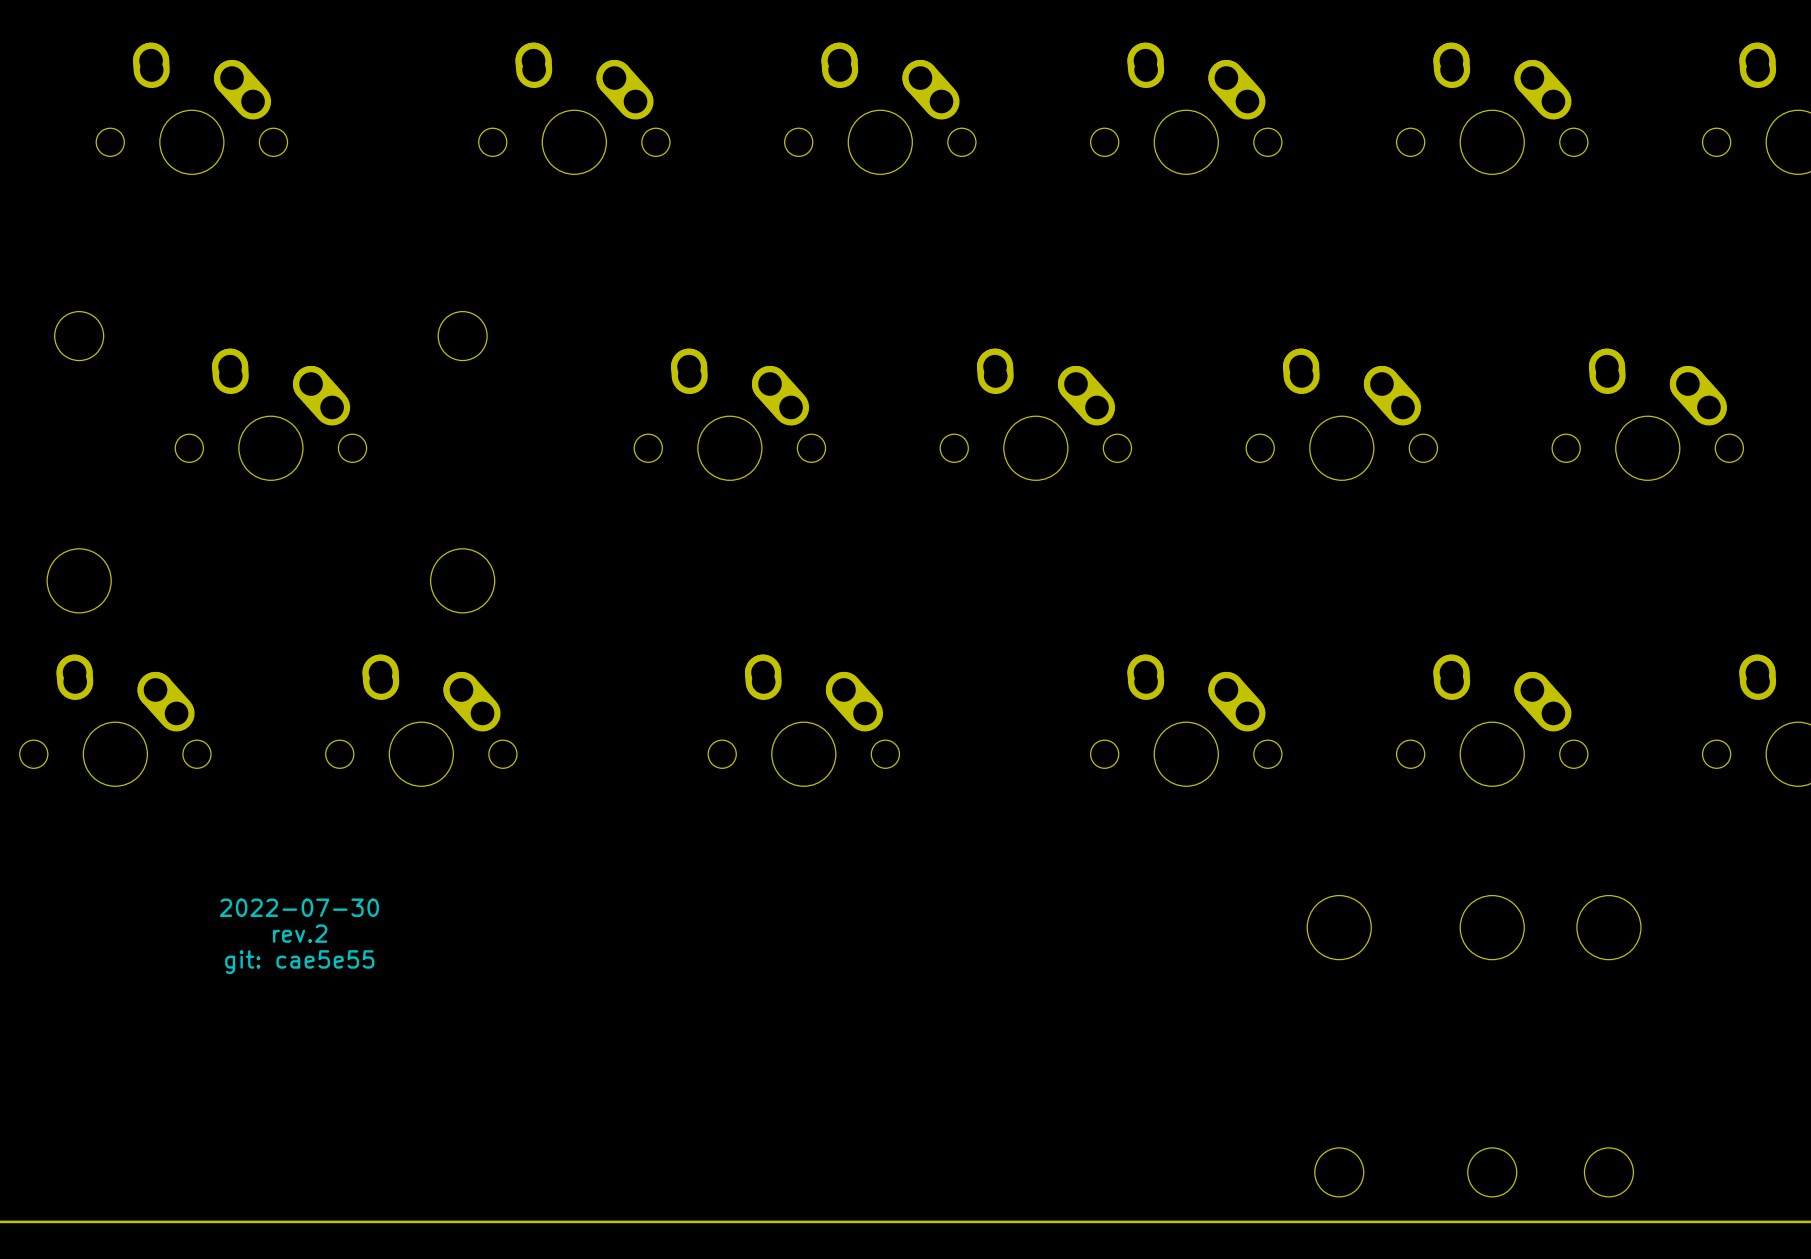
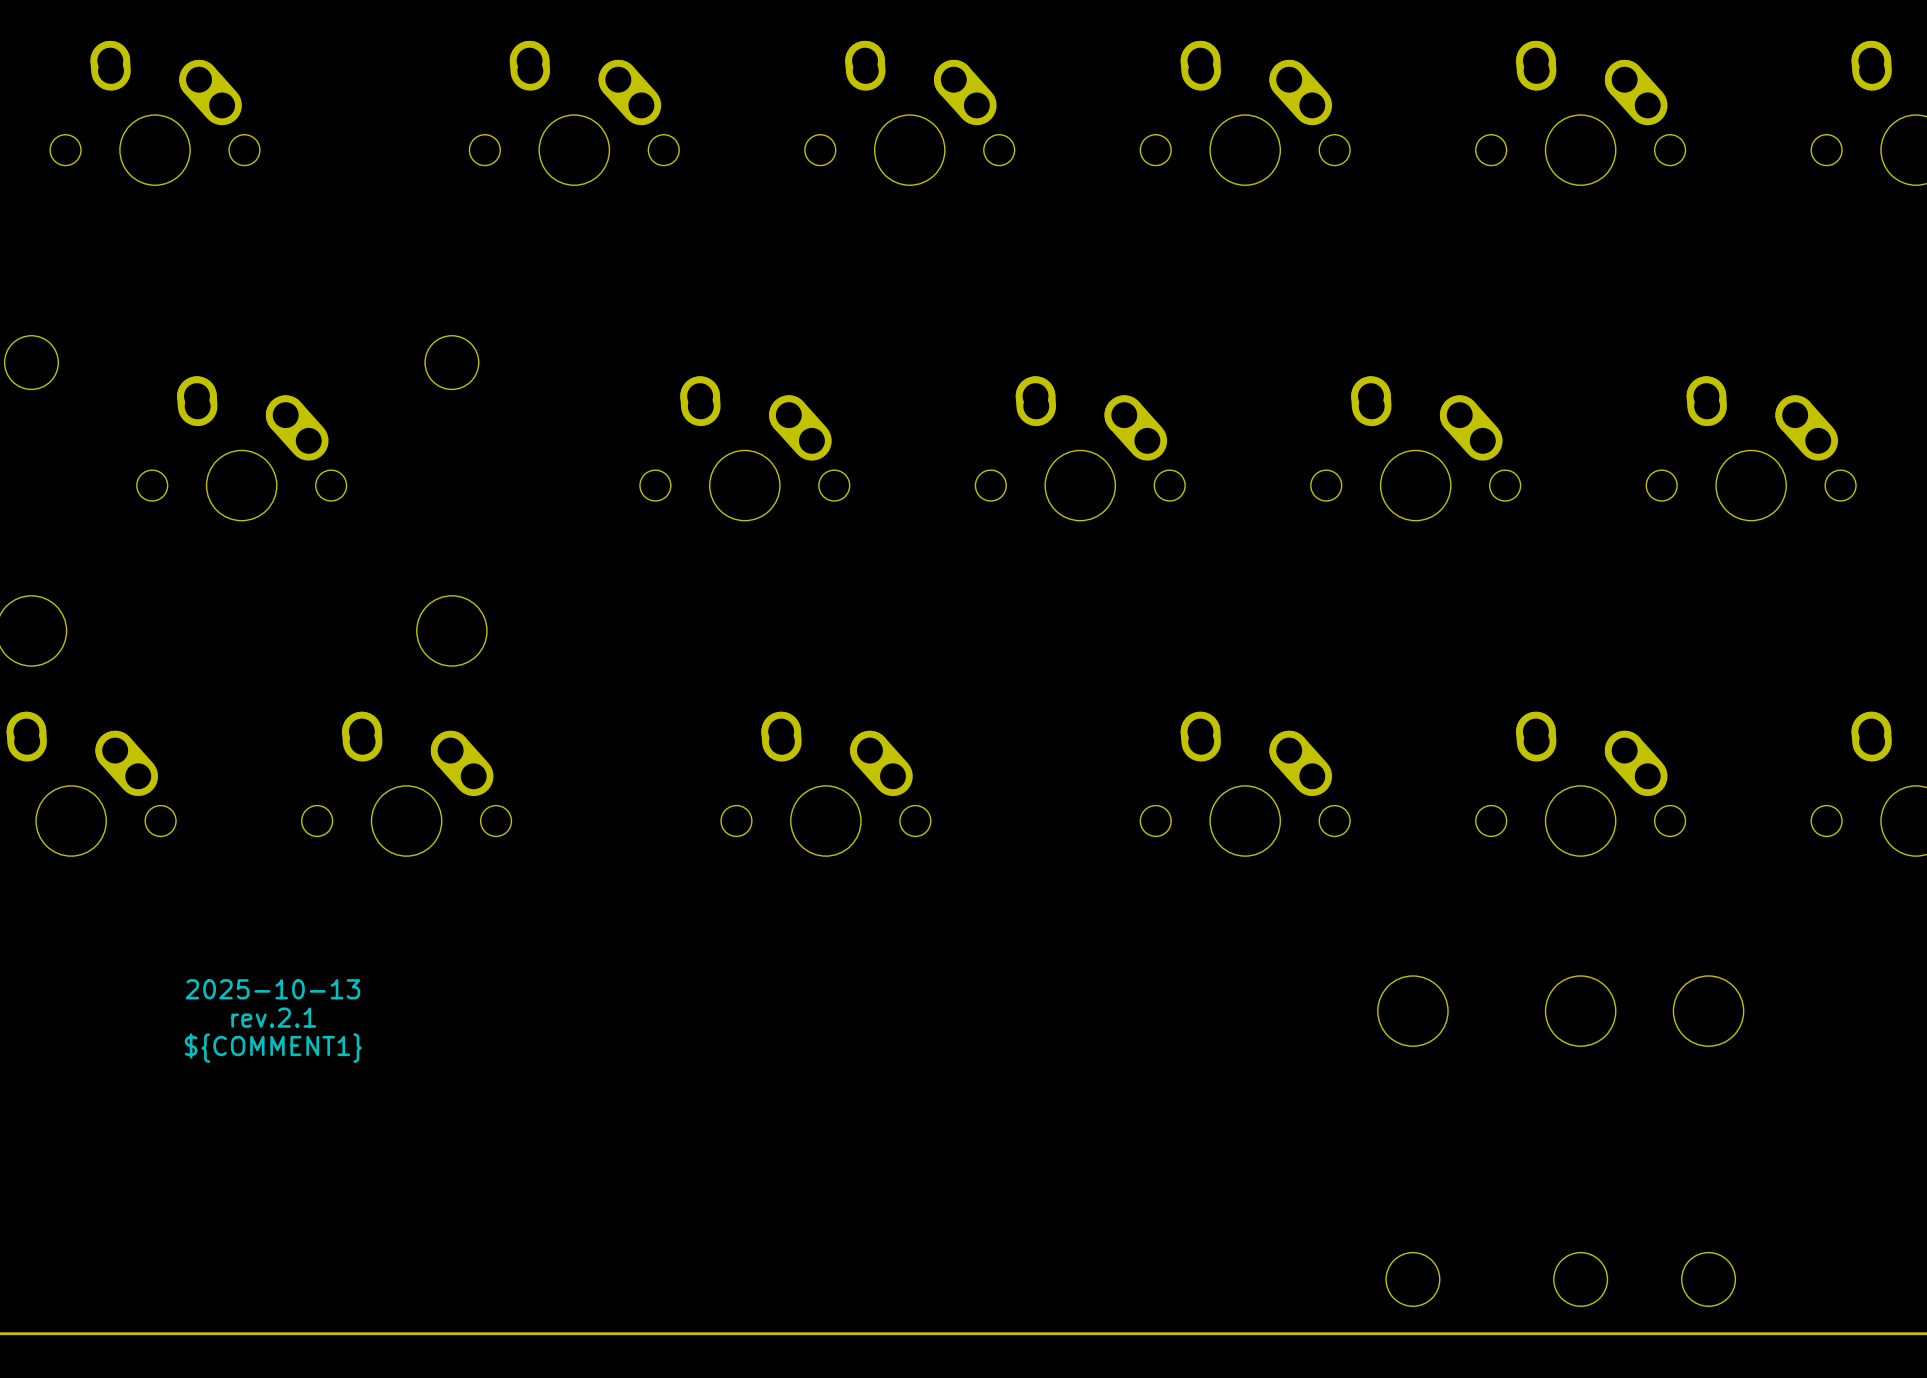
text: 2022-07-30 (299, 907) -> 2025-10-13 (272, 989)
text: rev.2 (300, 933) -> rev.2.1 (273, 1017)
text: git: cae5e55 (299, 962) -> ${COMMENT1} (273, 1048)

